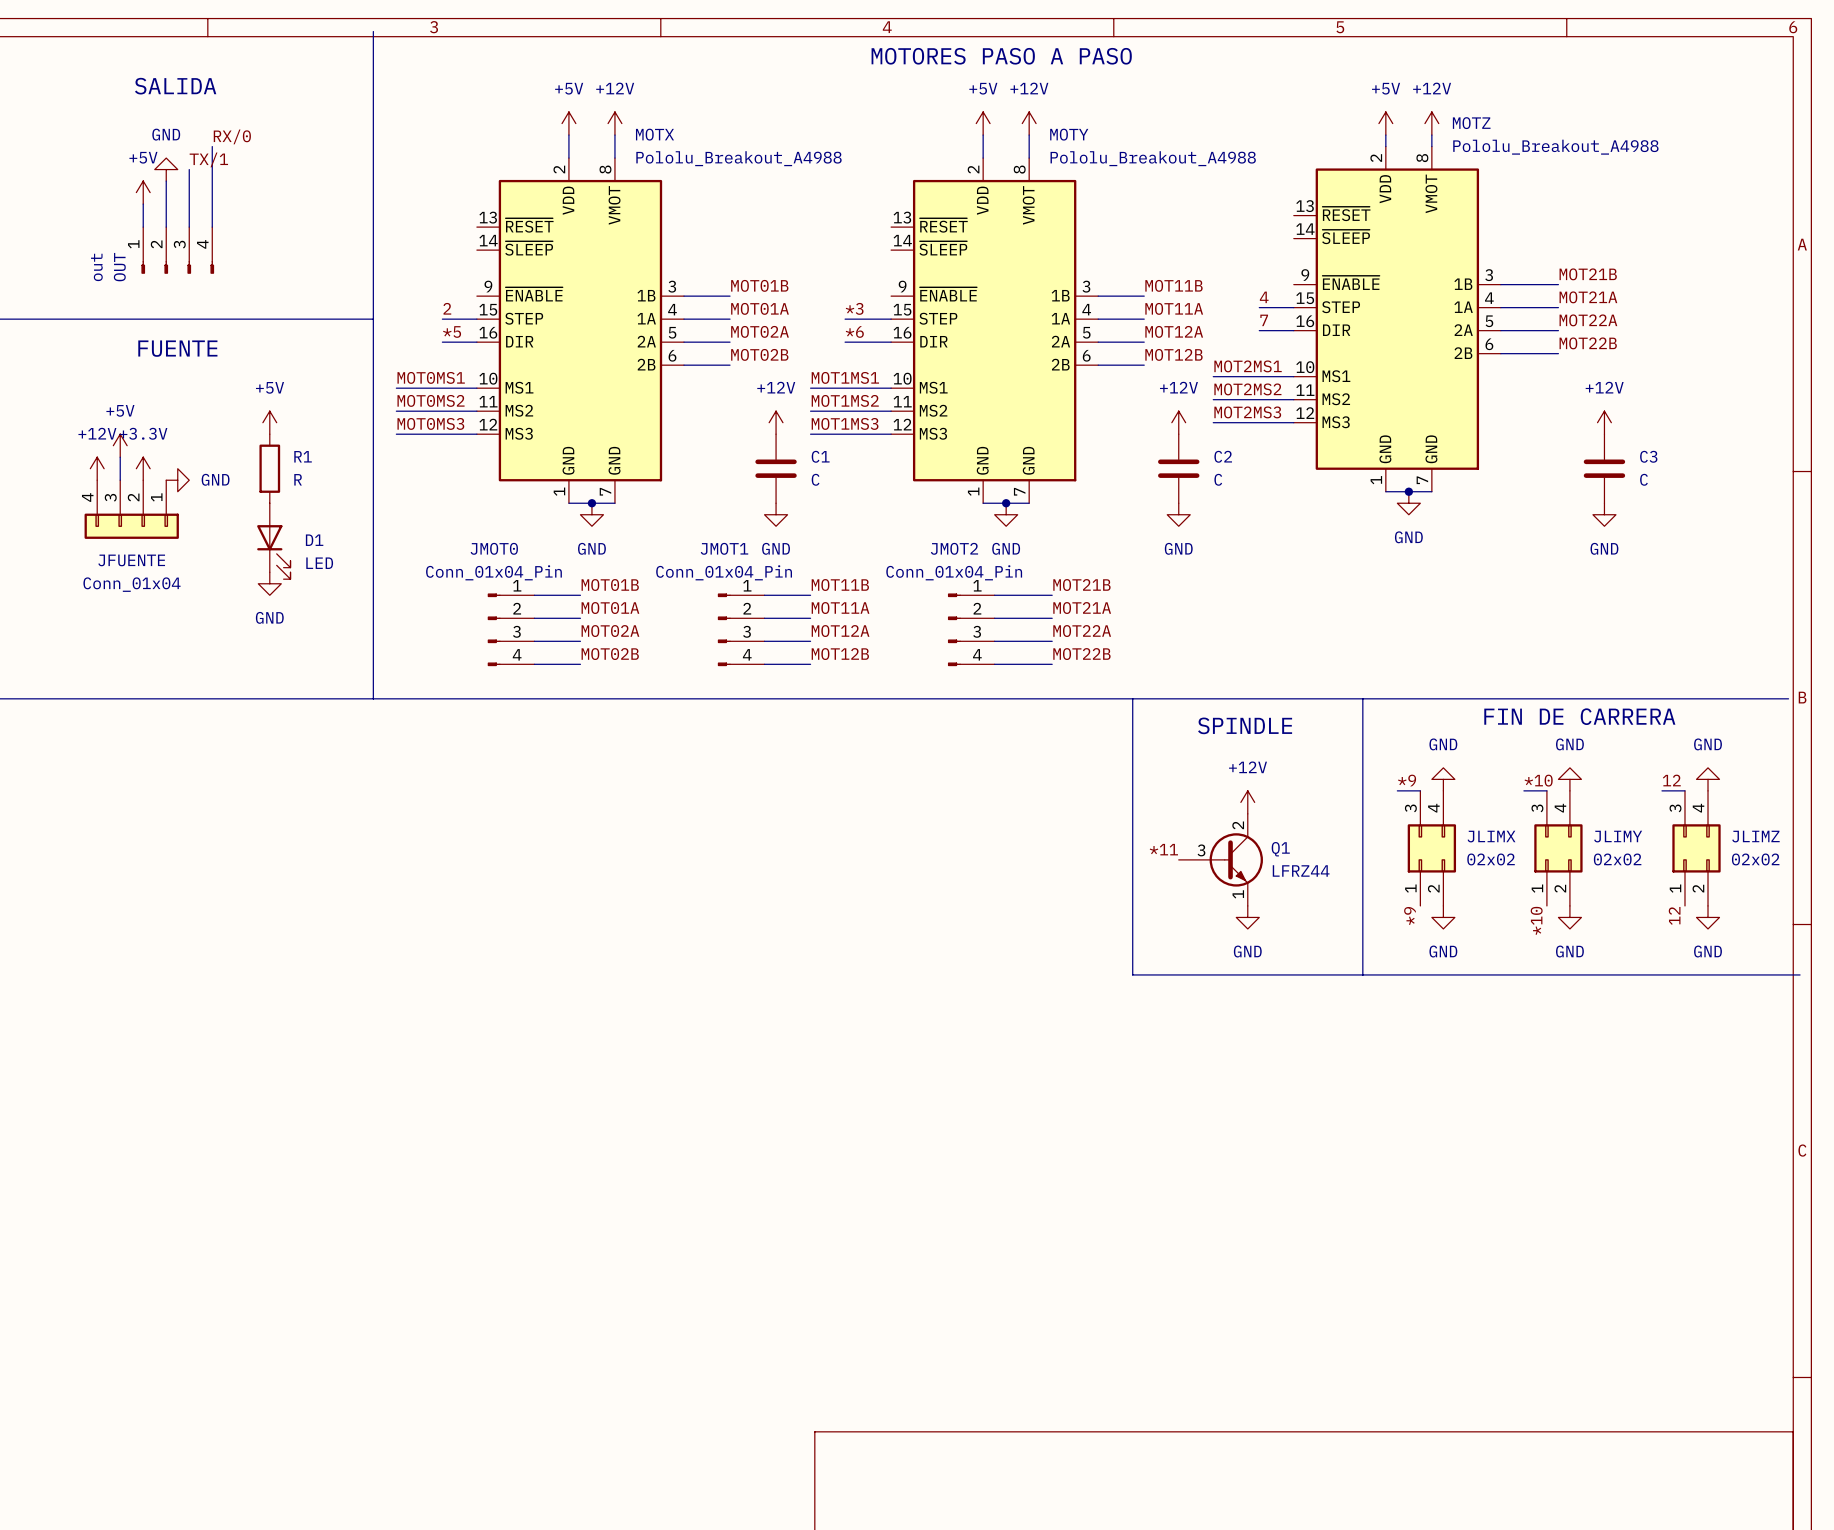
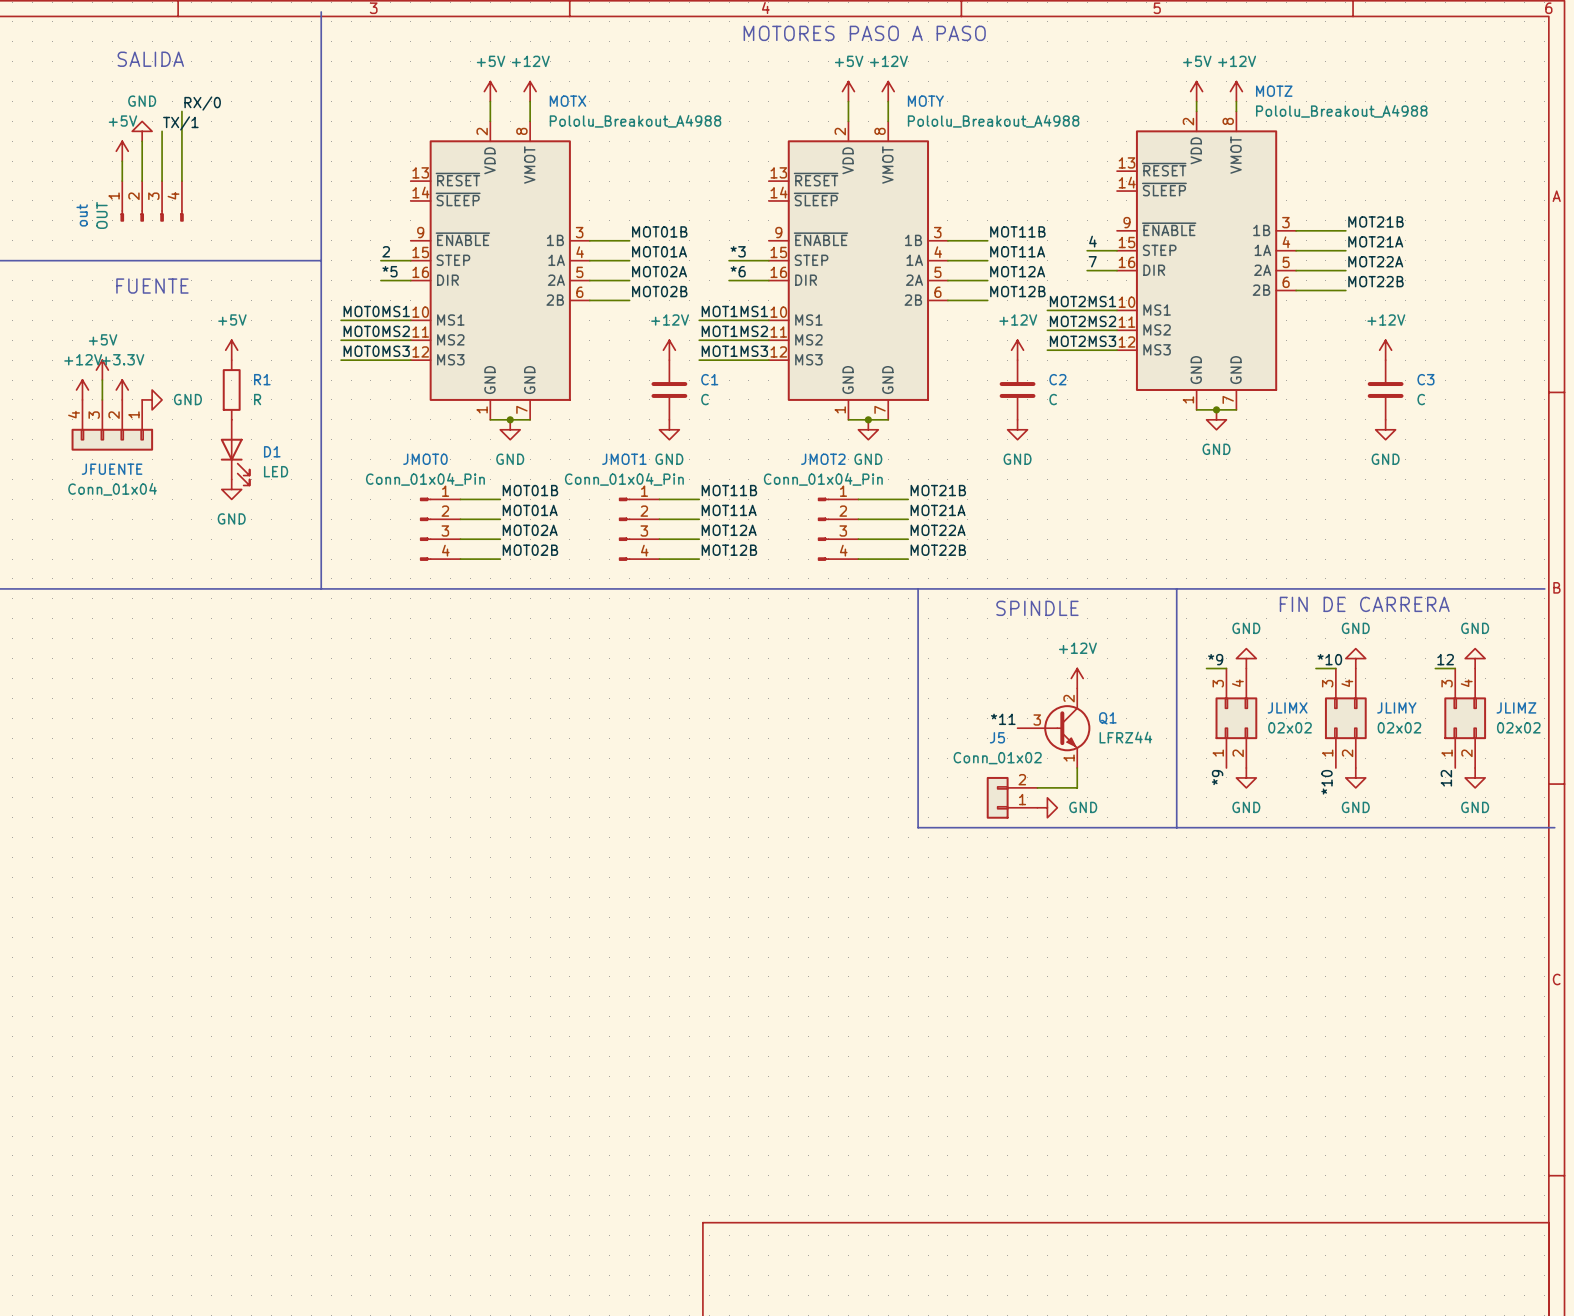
line: (1132, 698) (1132, 974) -> (918, 588) (918, 827) (977, 827)
text position: SPINDLE (1245, 725) -> SPINDLE (1037, 608)
wire: none -> (1077, 768) (1077, 787) (1037, 787)
power symbol rotation: 0° (1247, 917) -> 90° counterclockwise (1047, 807)
power symbol position: GND (1247, 917) -> GND (1047, 807)
J5: none -> Conn_01x02 (1012, 797)

